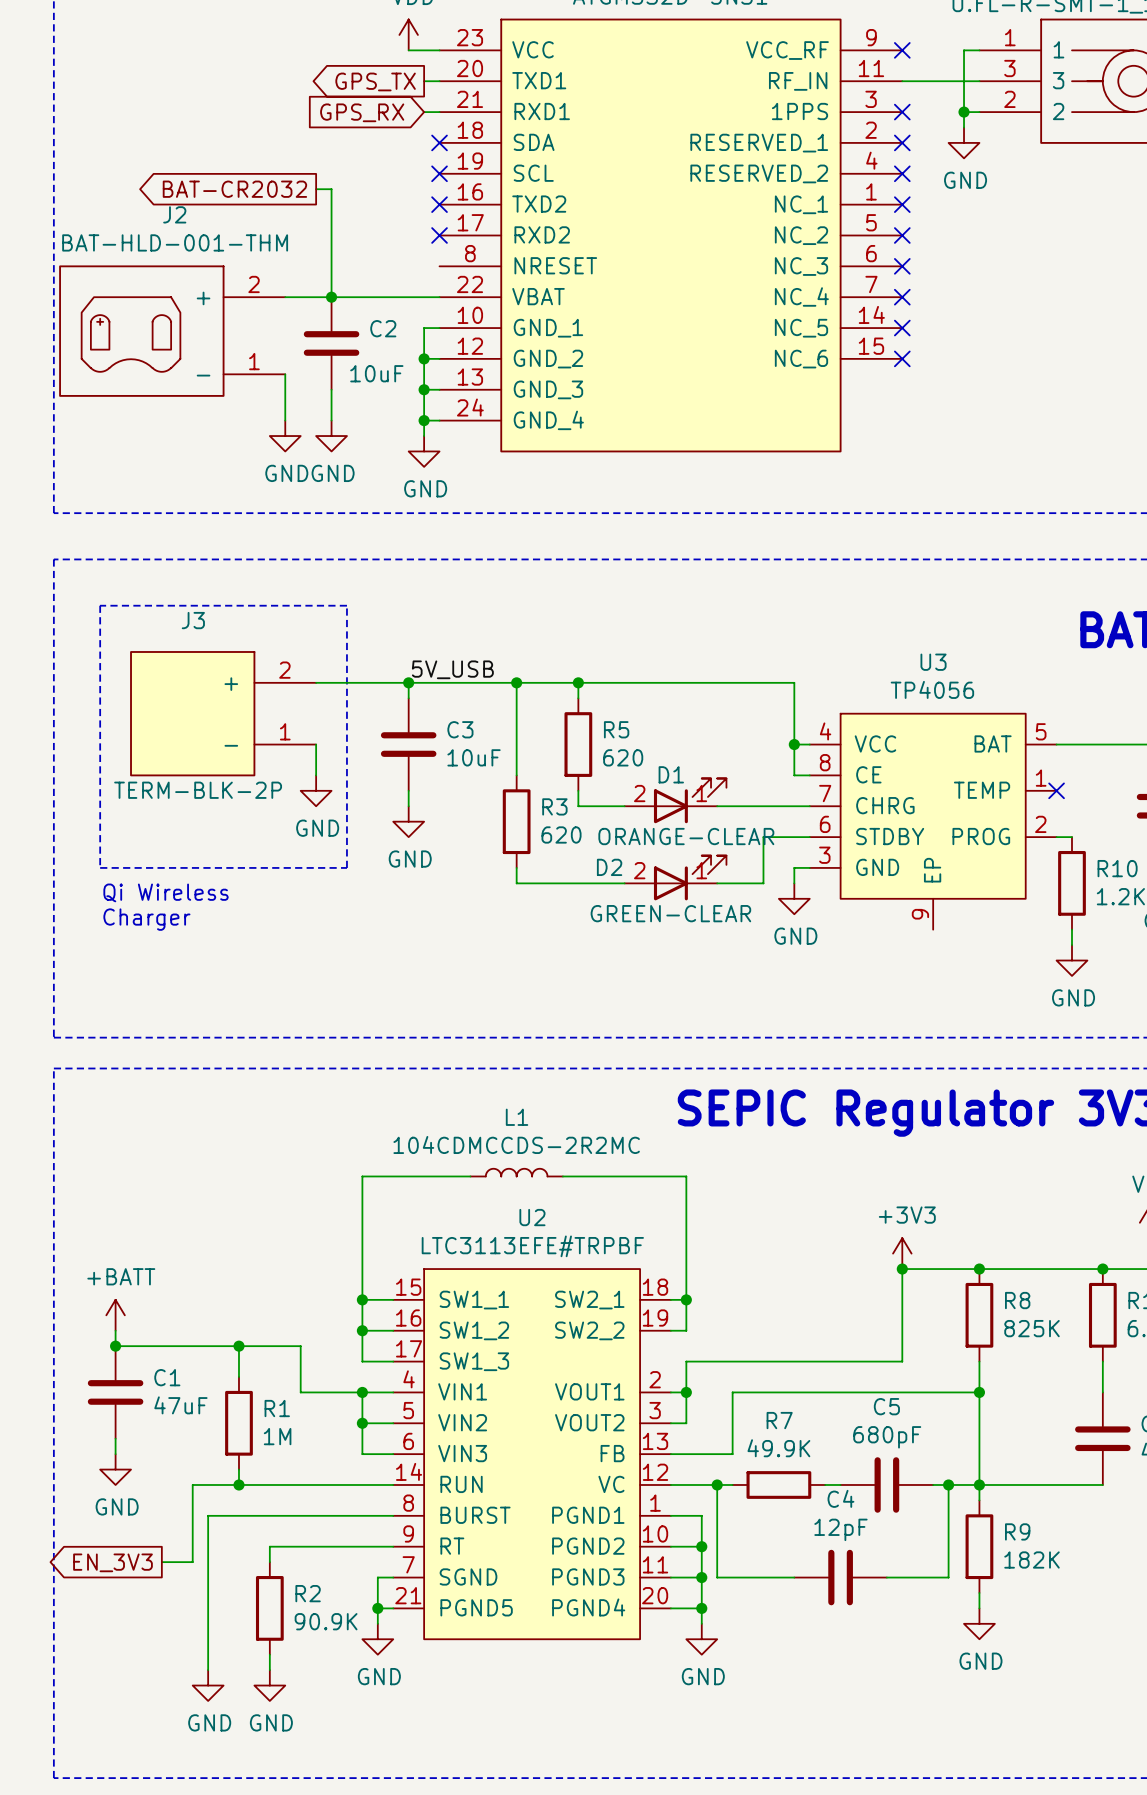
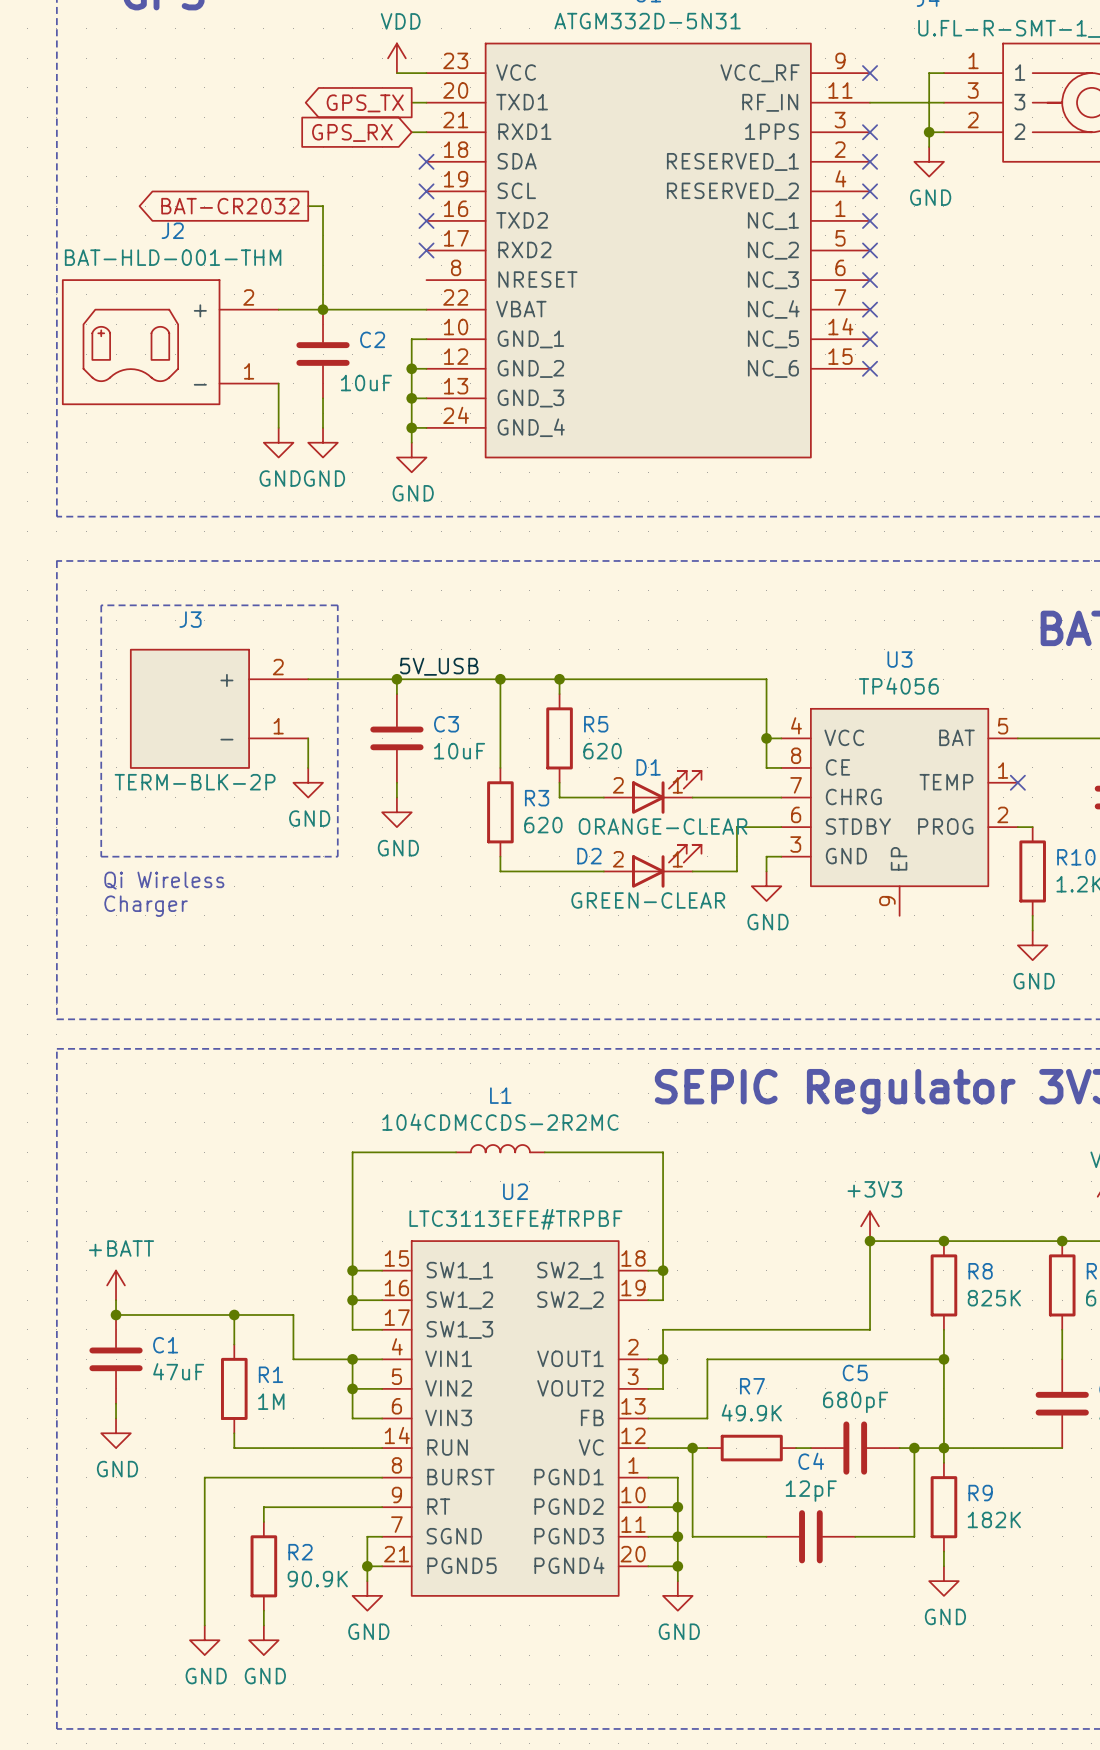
wire: (238, 1484) (192, 1484) (192, 1562) (161, 1562) -> none
junction: (238, 1484) -> none
global label: EN_3V3 (112, 1562) -> none

